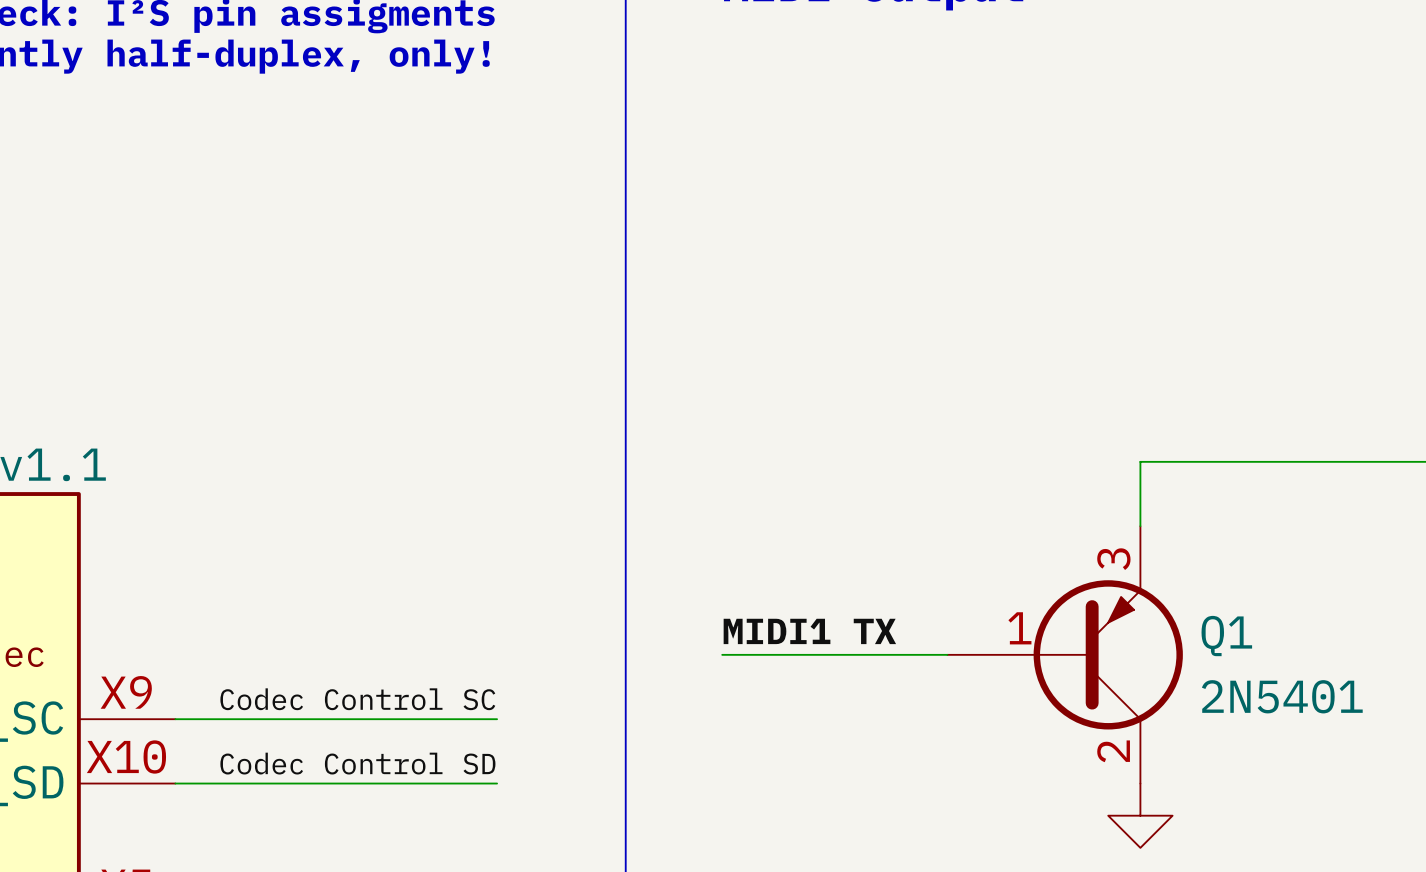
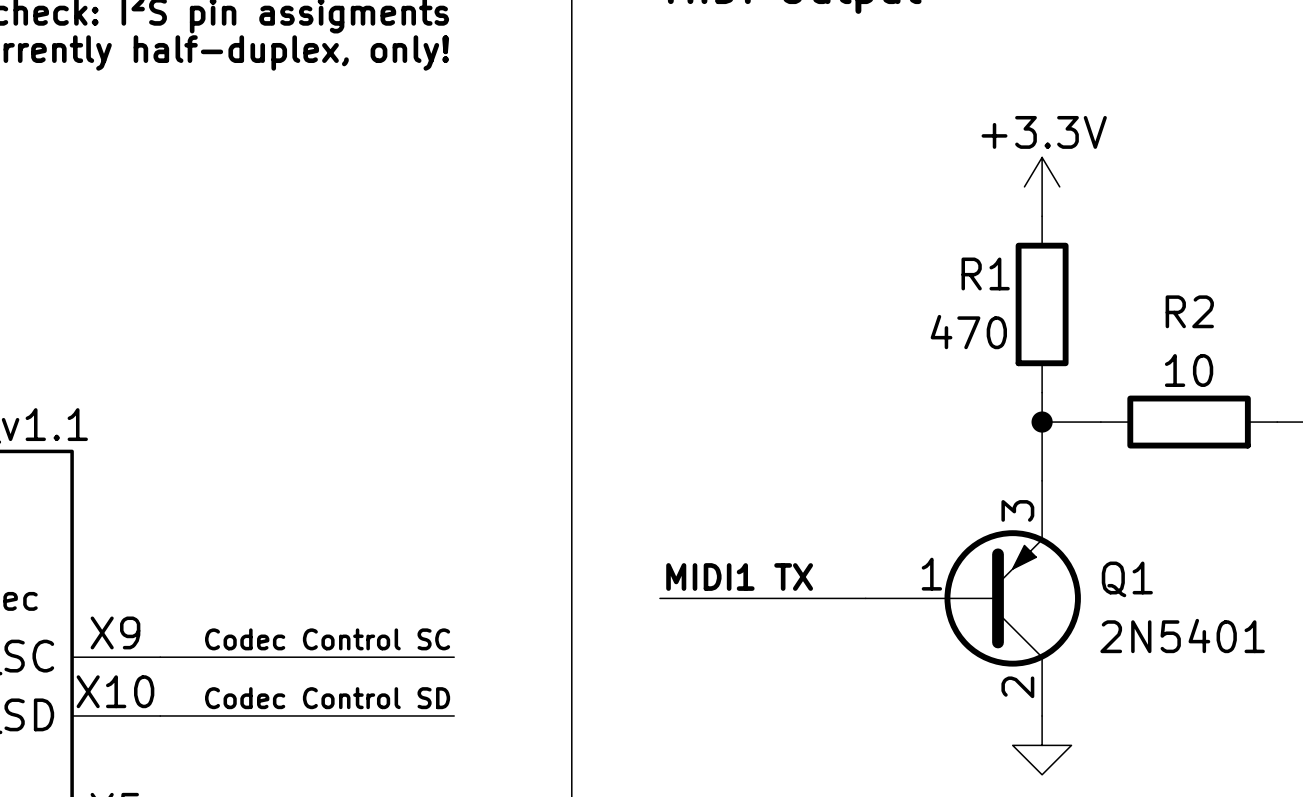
power symbol: none -> +3.3V (1042, 186)
R1: none -> 470 (1042, 304)
wire: none -> (1042, 392) (1042, 422)
junction: none -> (1042, 422)
wire: (1204, 461) (1397, 461) -> none
R2: none -> 10 (1189, 422)

